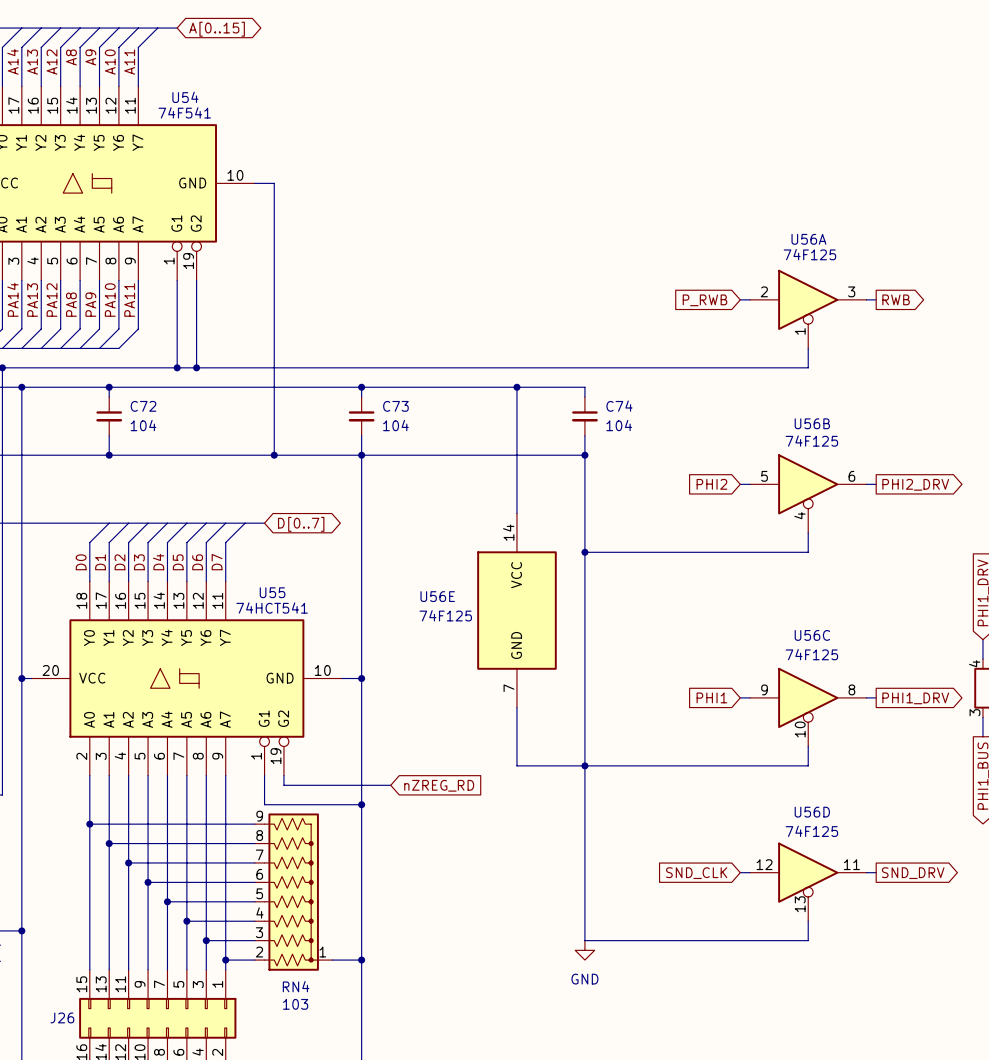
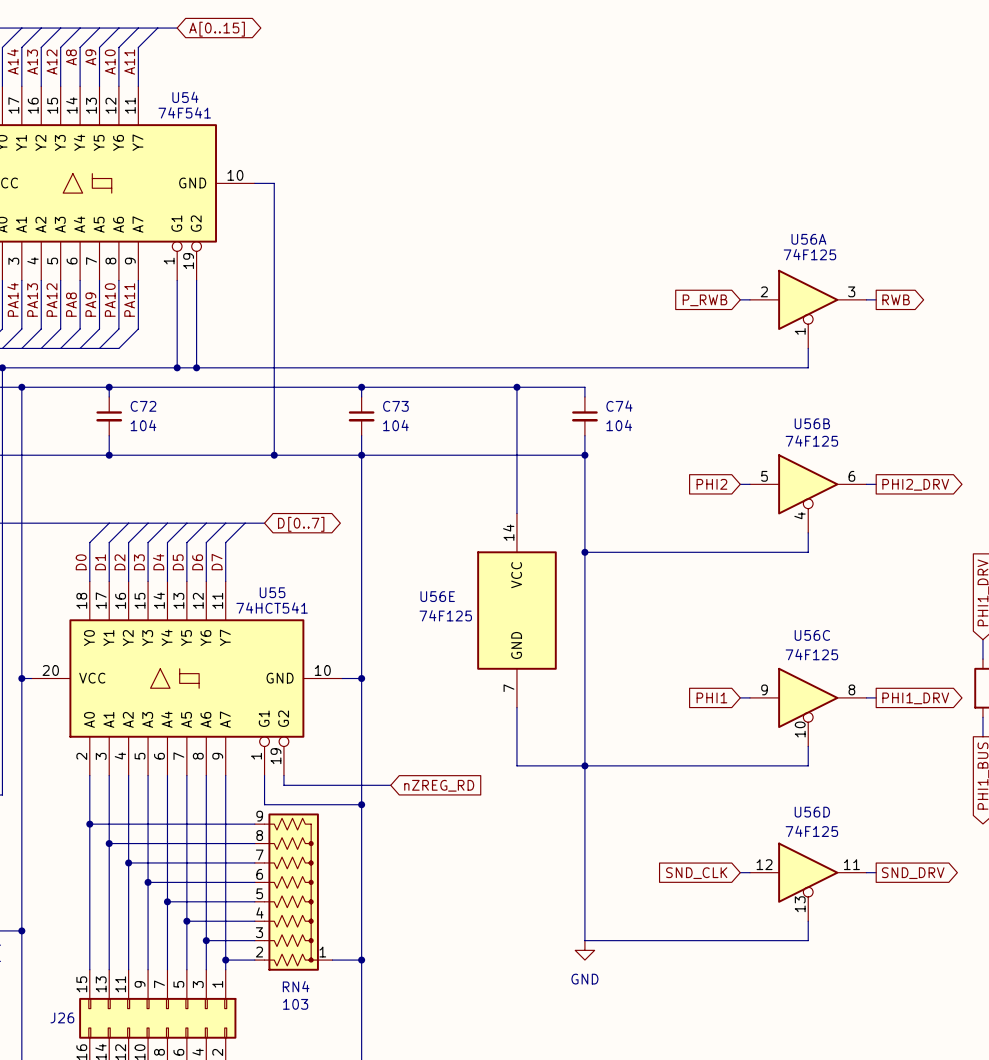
part pin number: 4 (974, 663) -> none
part pin number: 3 (974, 712) -> none

